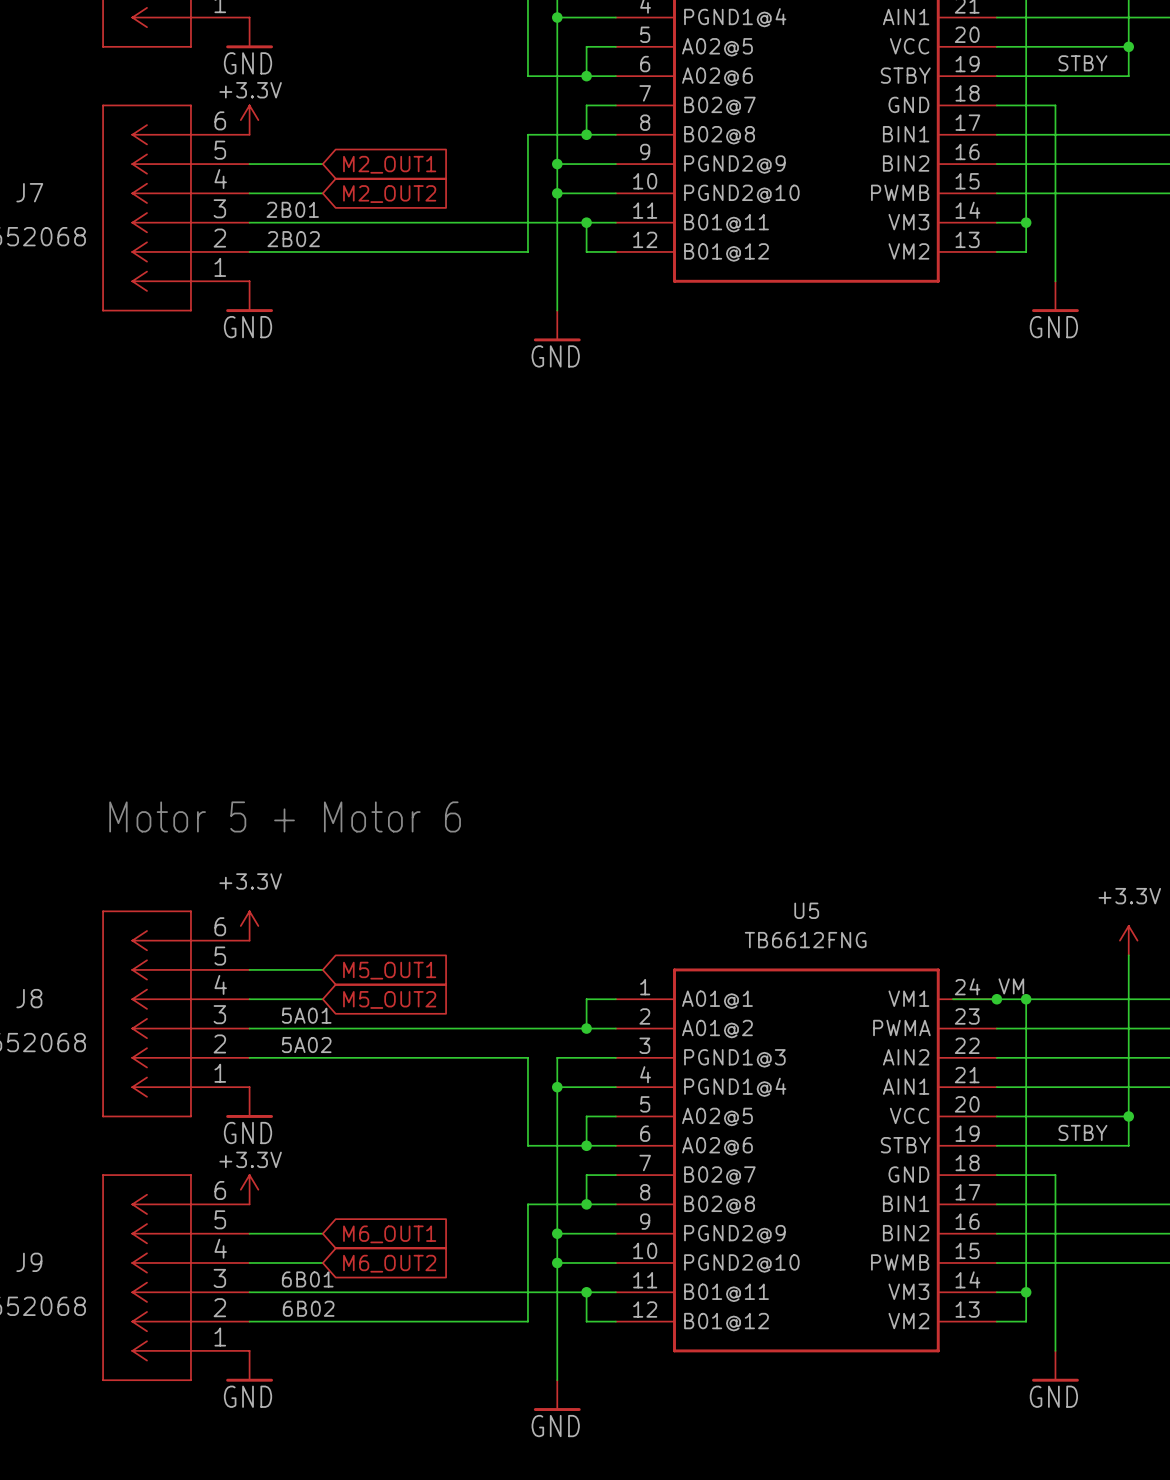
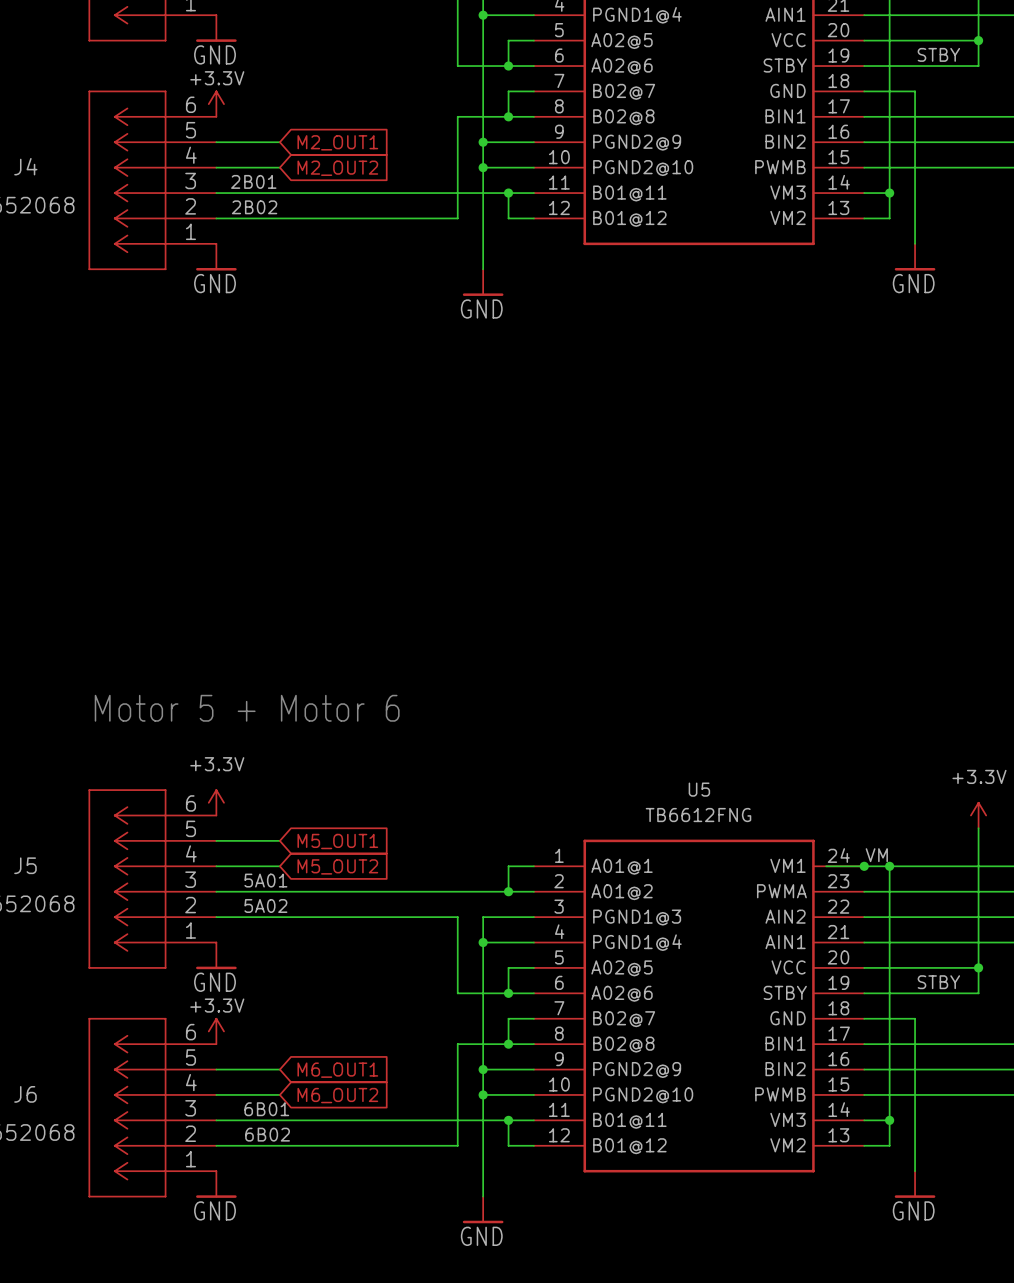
J7 name: J7 (29, 192) -> J4 (25, 166)
J8 name: J8 (29, 998) -> J5 (25, 865)
J9 name: J9 (29, 1262) -> J6 (25, 1094)

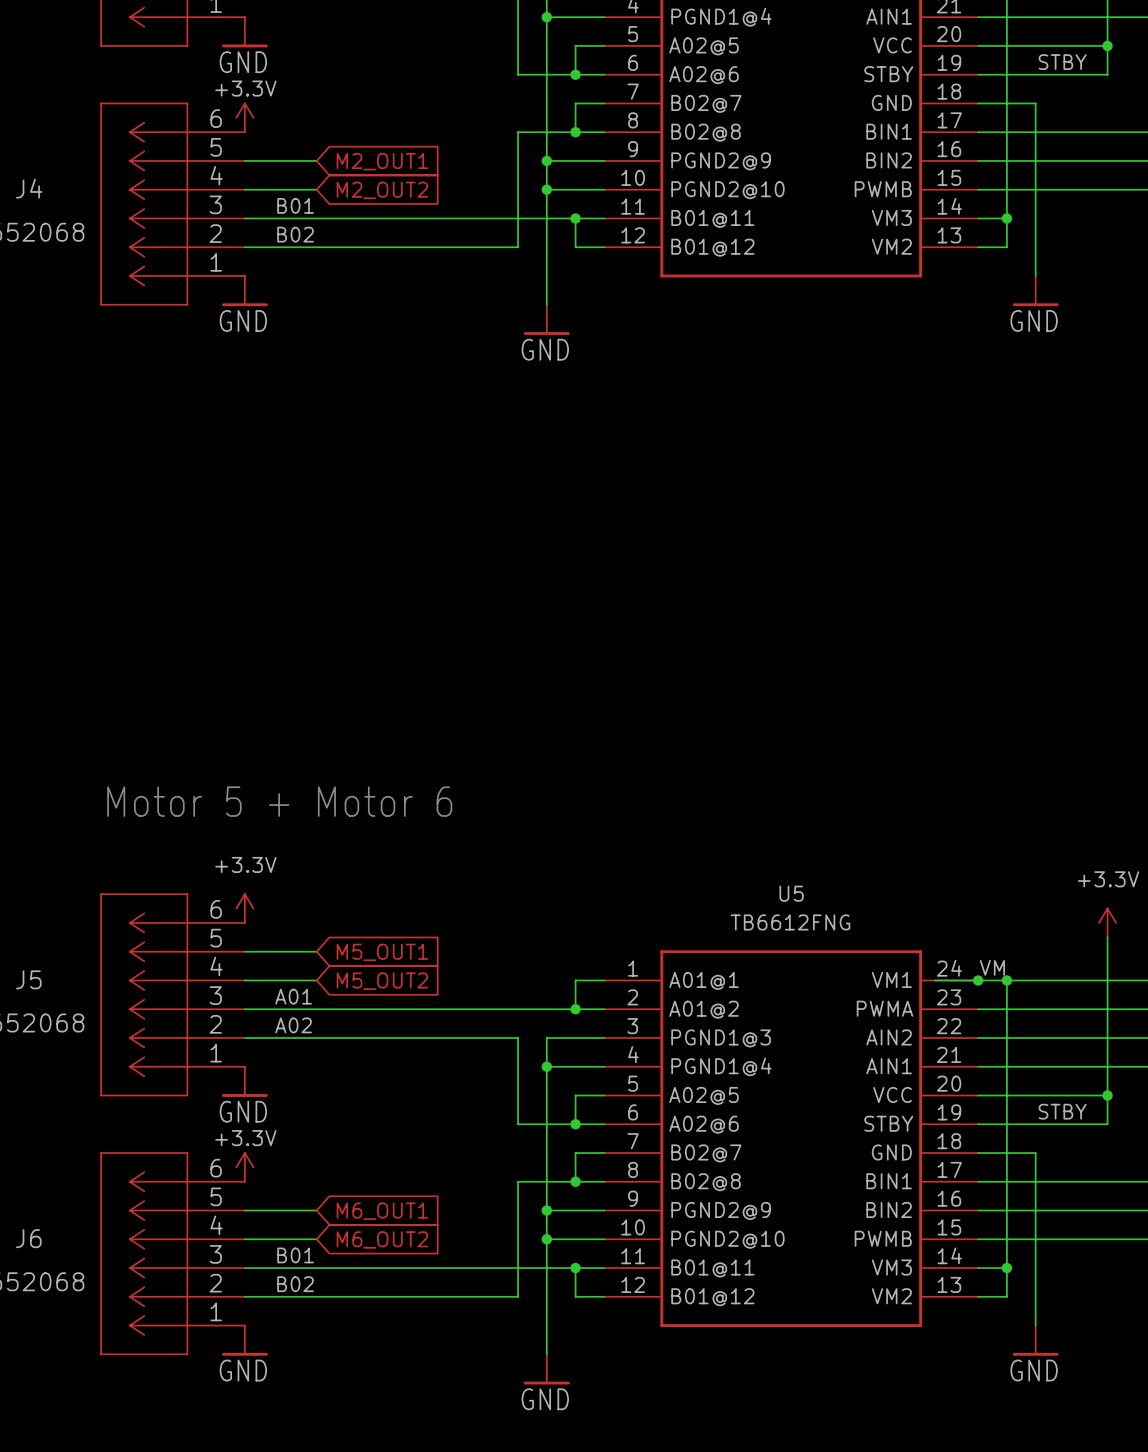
label: 2B01 (253, 181) -> B01 (295, 205)
label: 2B02 (254, 207) -> B02 (295, 234)
label: 5A01 (265, 880) -> A01 (293, 996)
label: 5A02 (265, 905) -> A02 (293, 1025)
label: 6B01 (266, 1109) -> B01 (295, 1255)
label: 6B02 (267, 1134) -> B02 (295, 1284)

